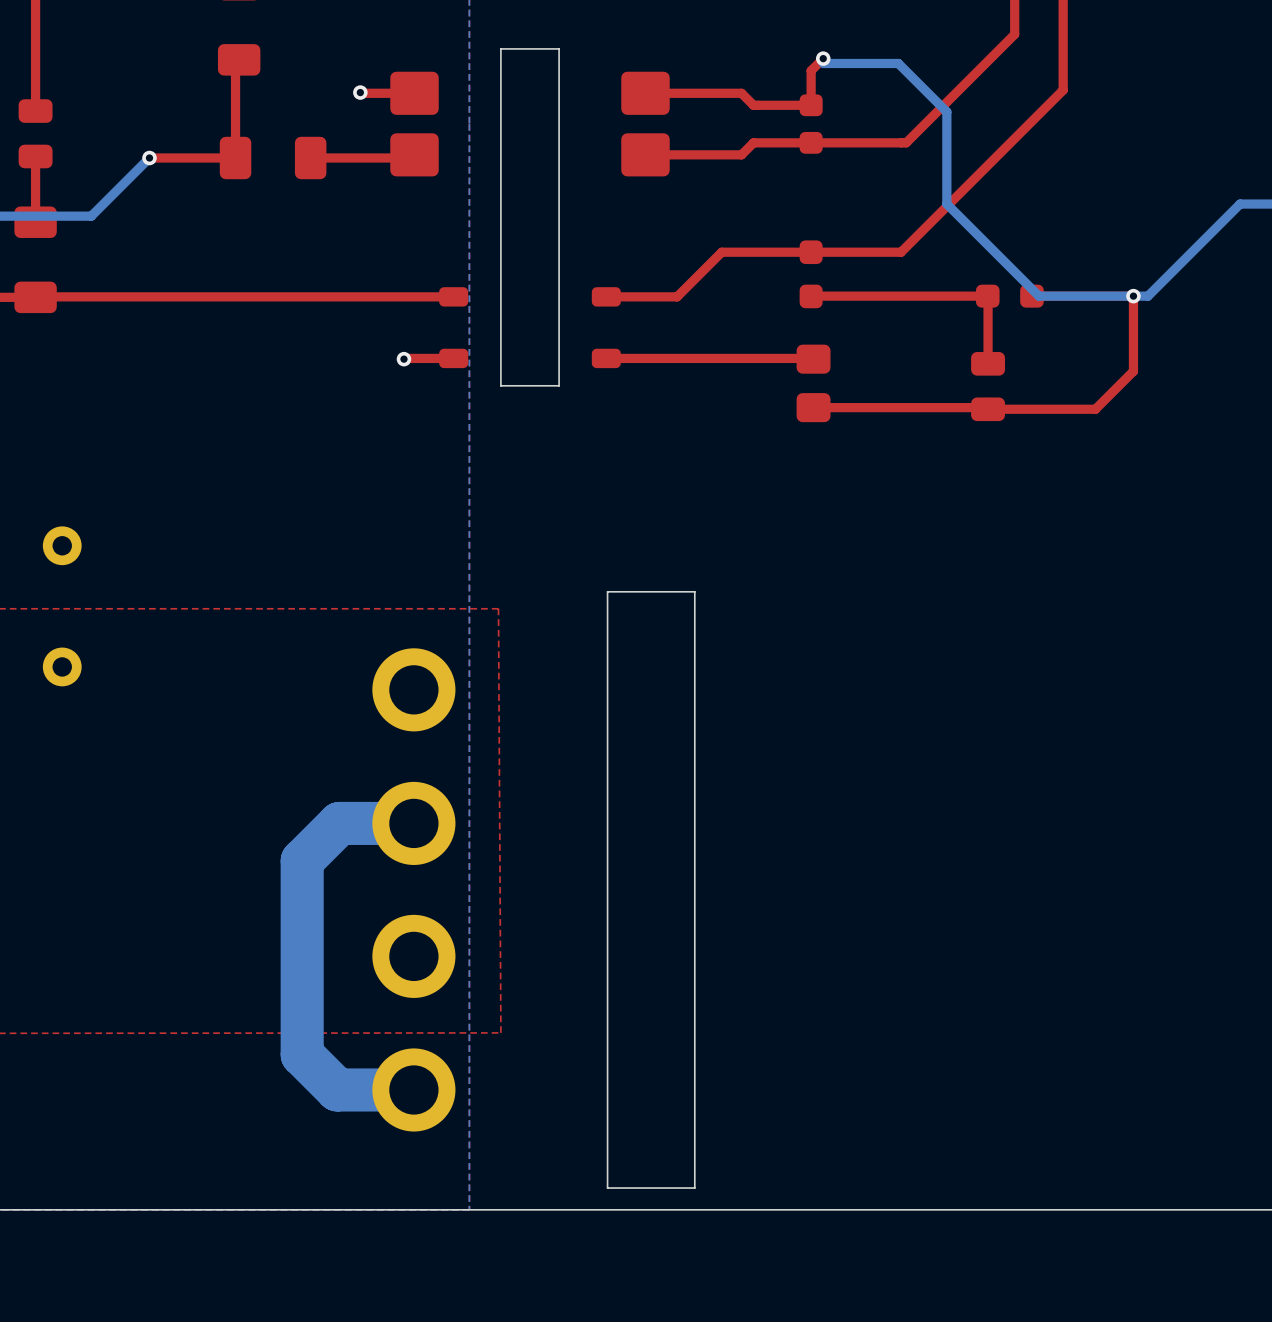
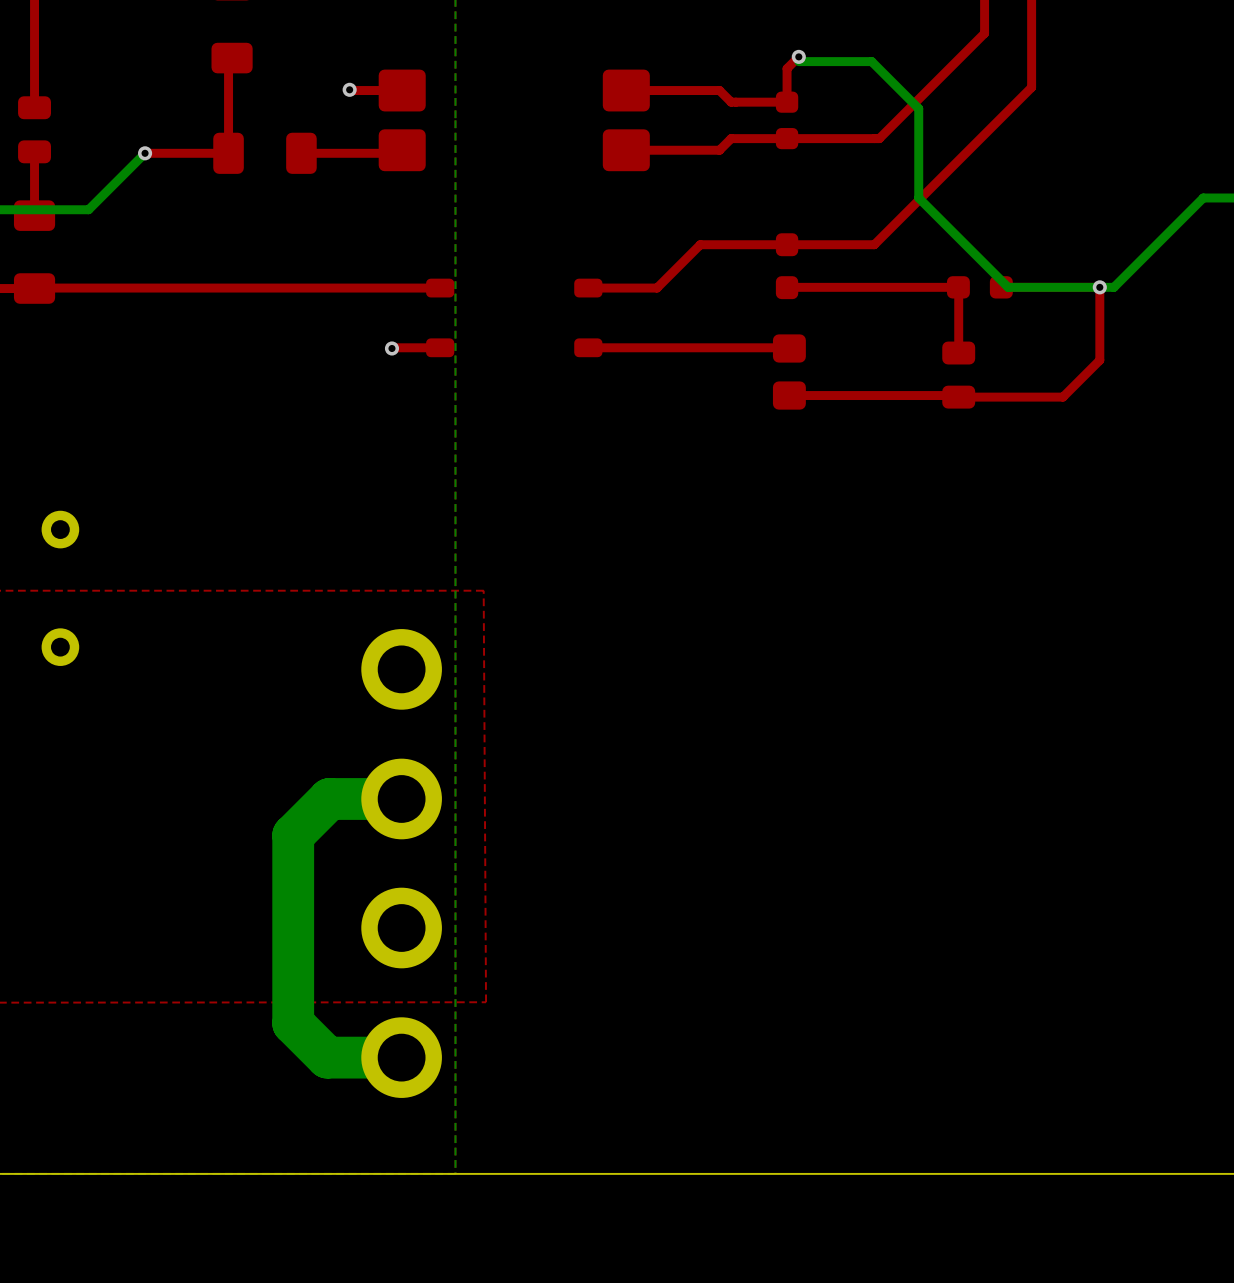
board edge: (559, 48) (500, 48) (500, 385) (559, 385) (559, 48) -> none
board edge: (694, 591) (607, 591) (607, 1188) (694, 1188) (694, 591) -> none

